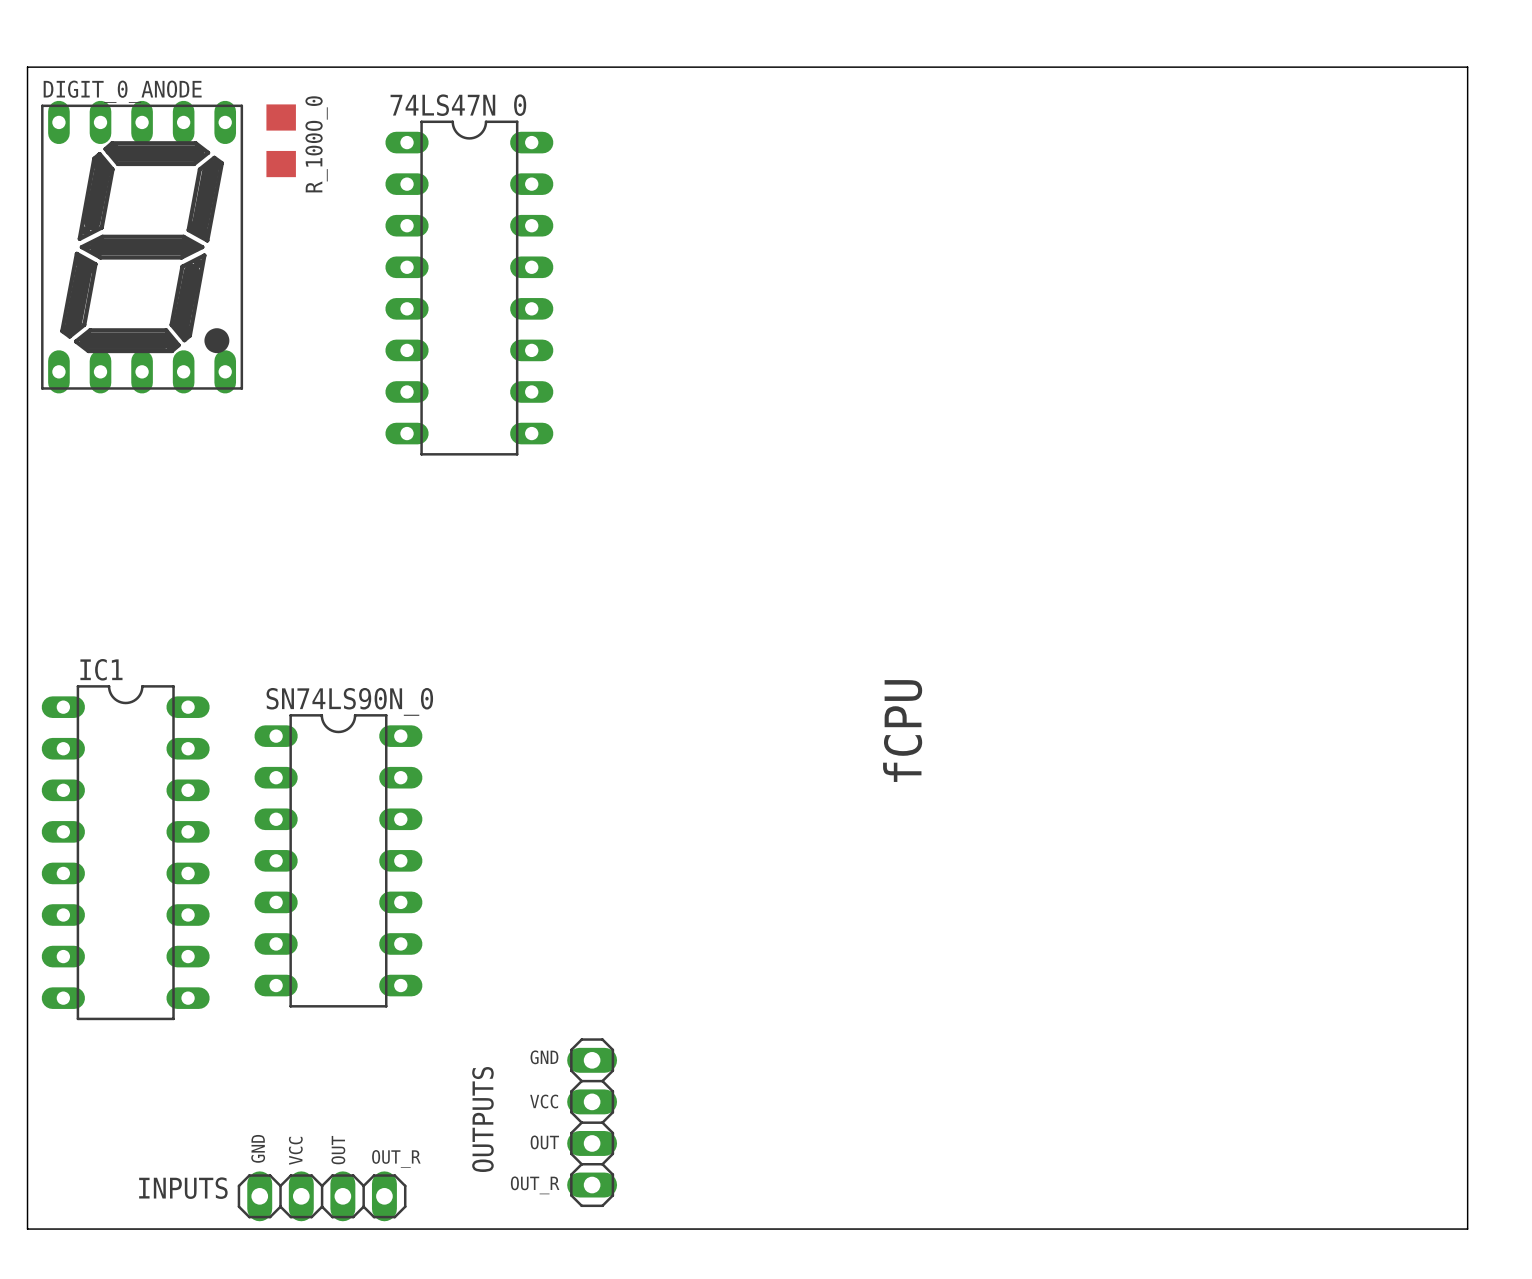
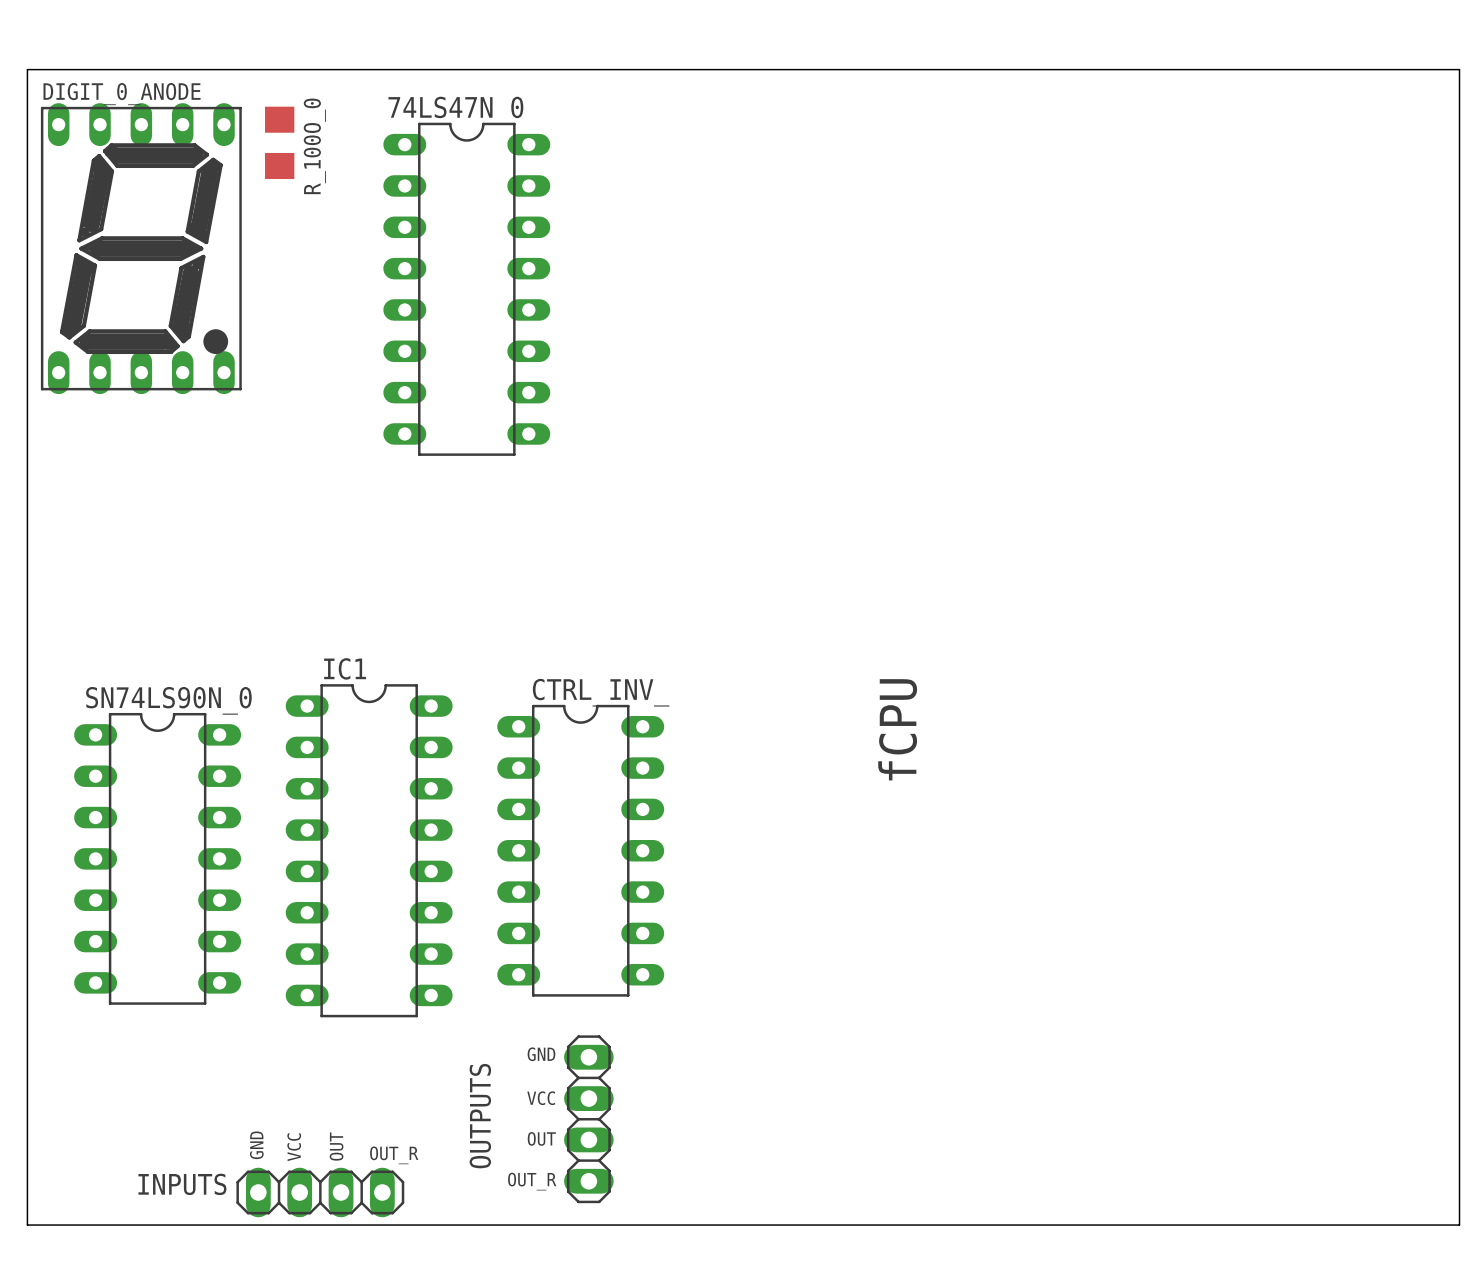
IC1 position: (125, 852) -> (369, 850)
CTRL_INV_: none -> (580, 850)
SN74LS90N_0 position: (338, 860) -> (157, 858)

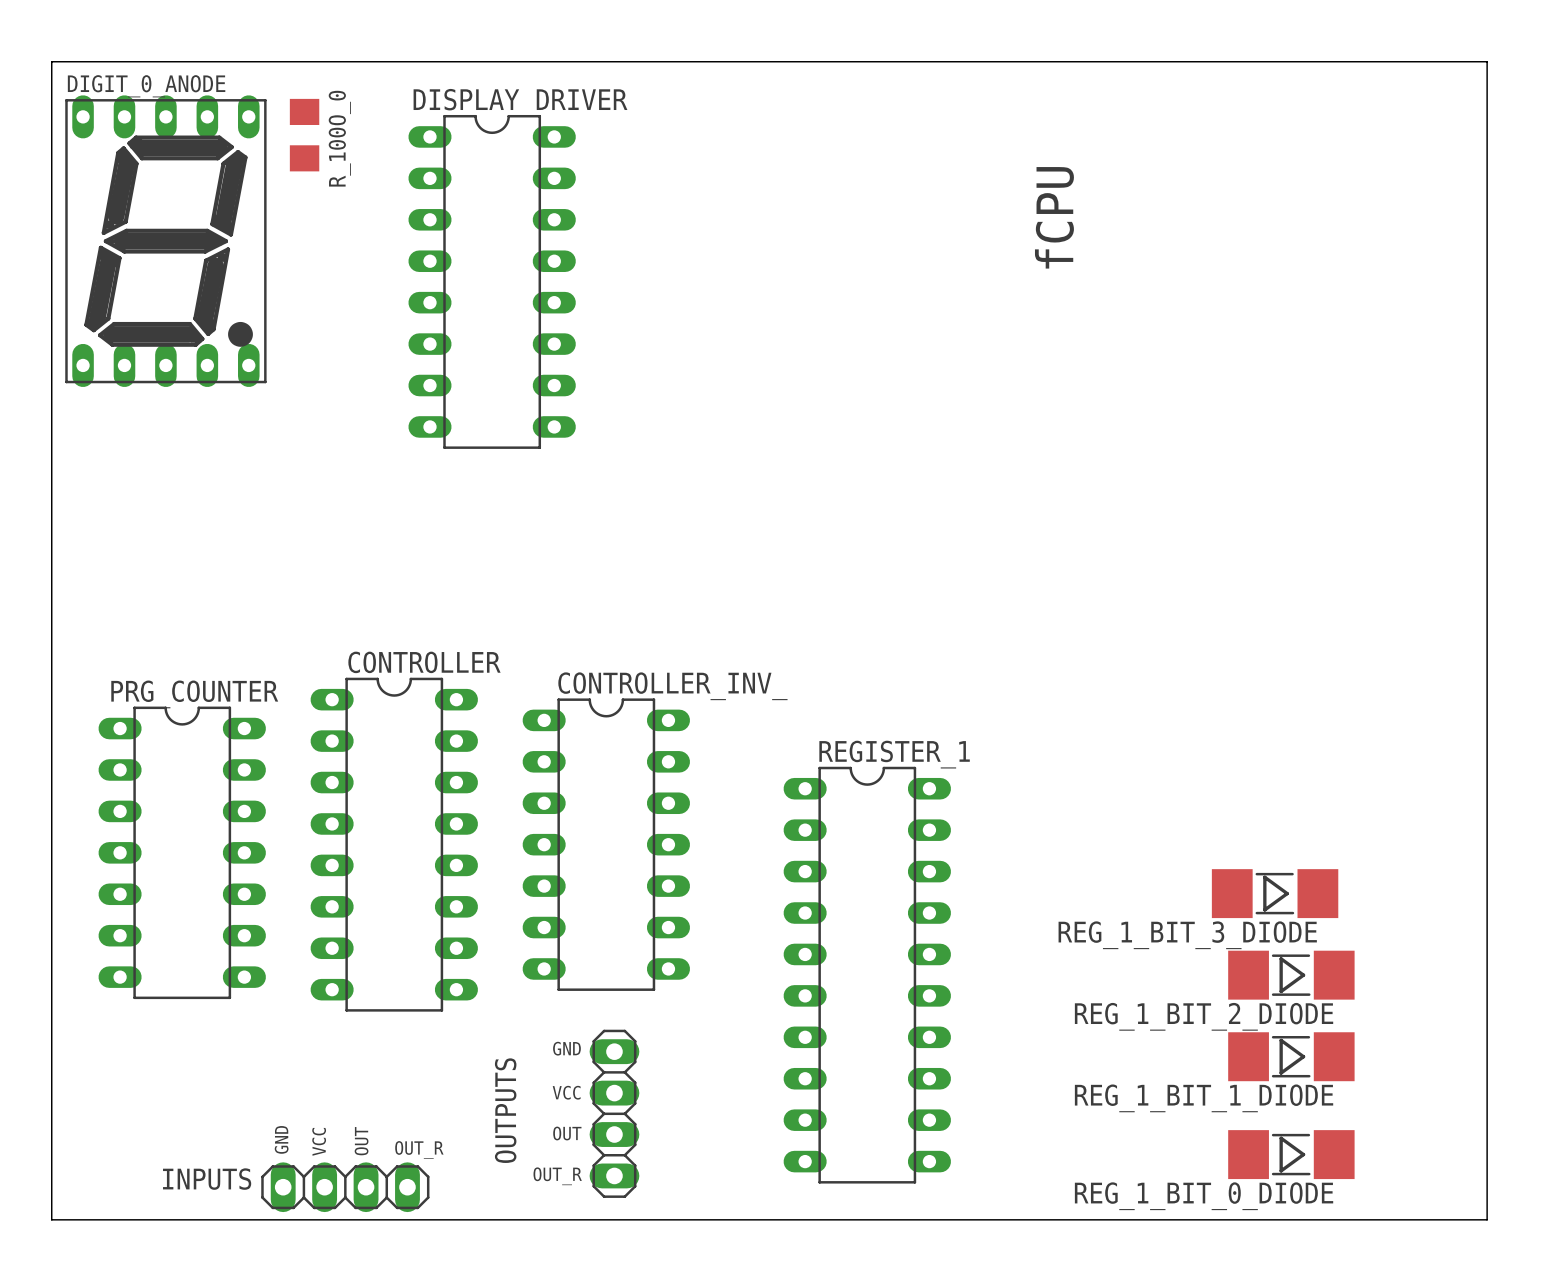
74LS47N_0 name: 74LS47N_0 (455, 110) -> DISPLAY_DRIVER (520, 102)
text: none -> fCPU (1054, 217)
IC1 name: IC1 (345, 668) -> CONTROLLER (424, 662)
CTRL_INV_ name: CTRL_INV_ (601, 692) -> CONTROLLER_INV_ (672, 686)
SN74LS90N_0 name: SN74LS90N_0 (168, 700) -> PRG_COUNTER (194, 694)
text: fCPU (897, 729) -> none
REG_1_BIT_3_DIODE: none -> (1275, 893)
REGISTER_1: none -> (867, 975)
REG_1_BIT_2_DIODE: none -> (1291, 975)
REG_1_BIT_1_DIODE: none -> (1291, 1056)
REG_1_BIT_0_DIODE: none -> (1291, 1154)

